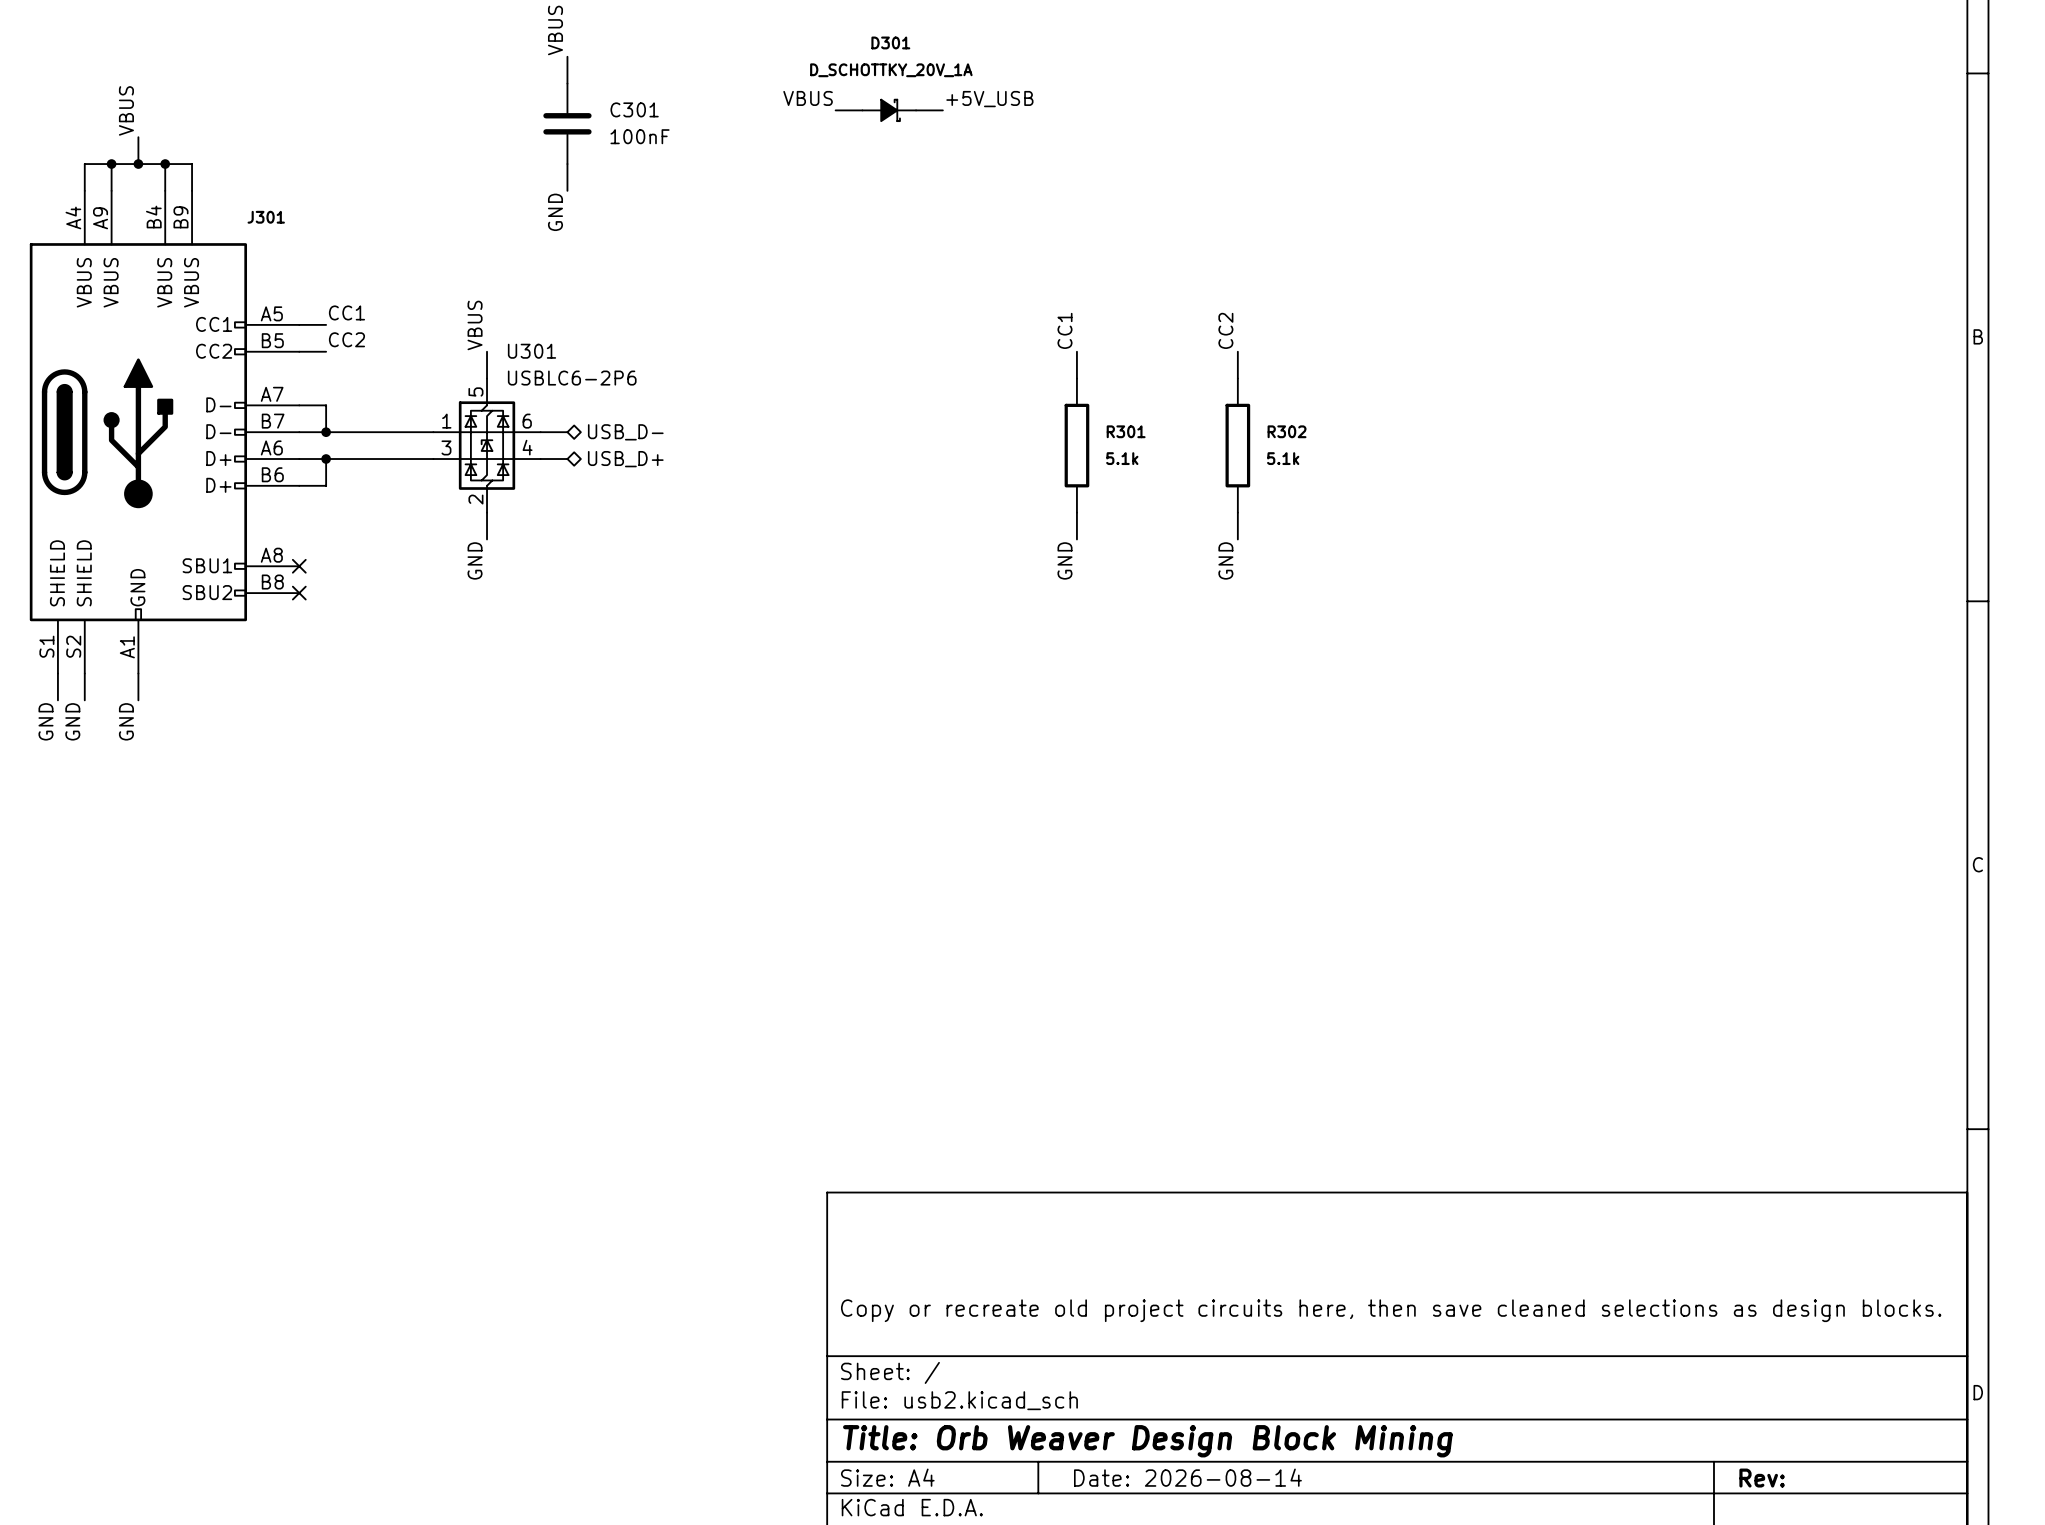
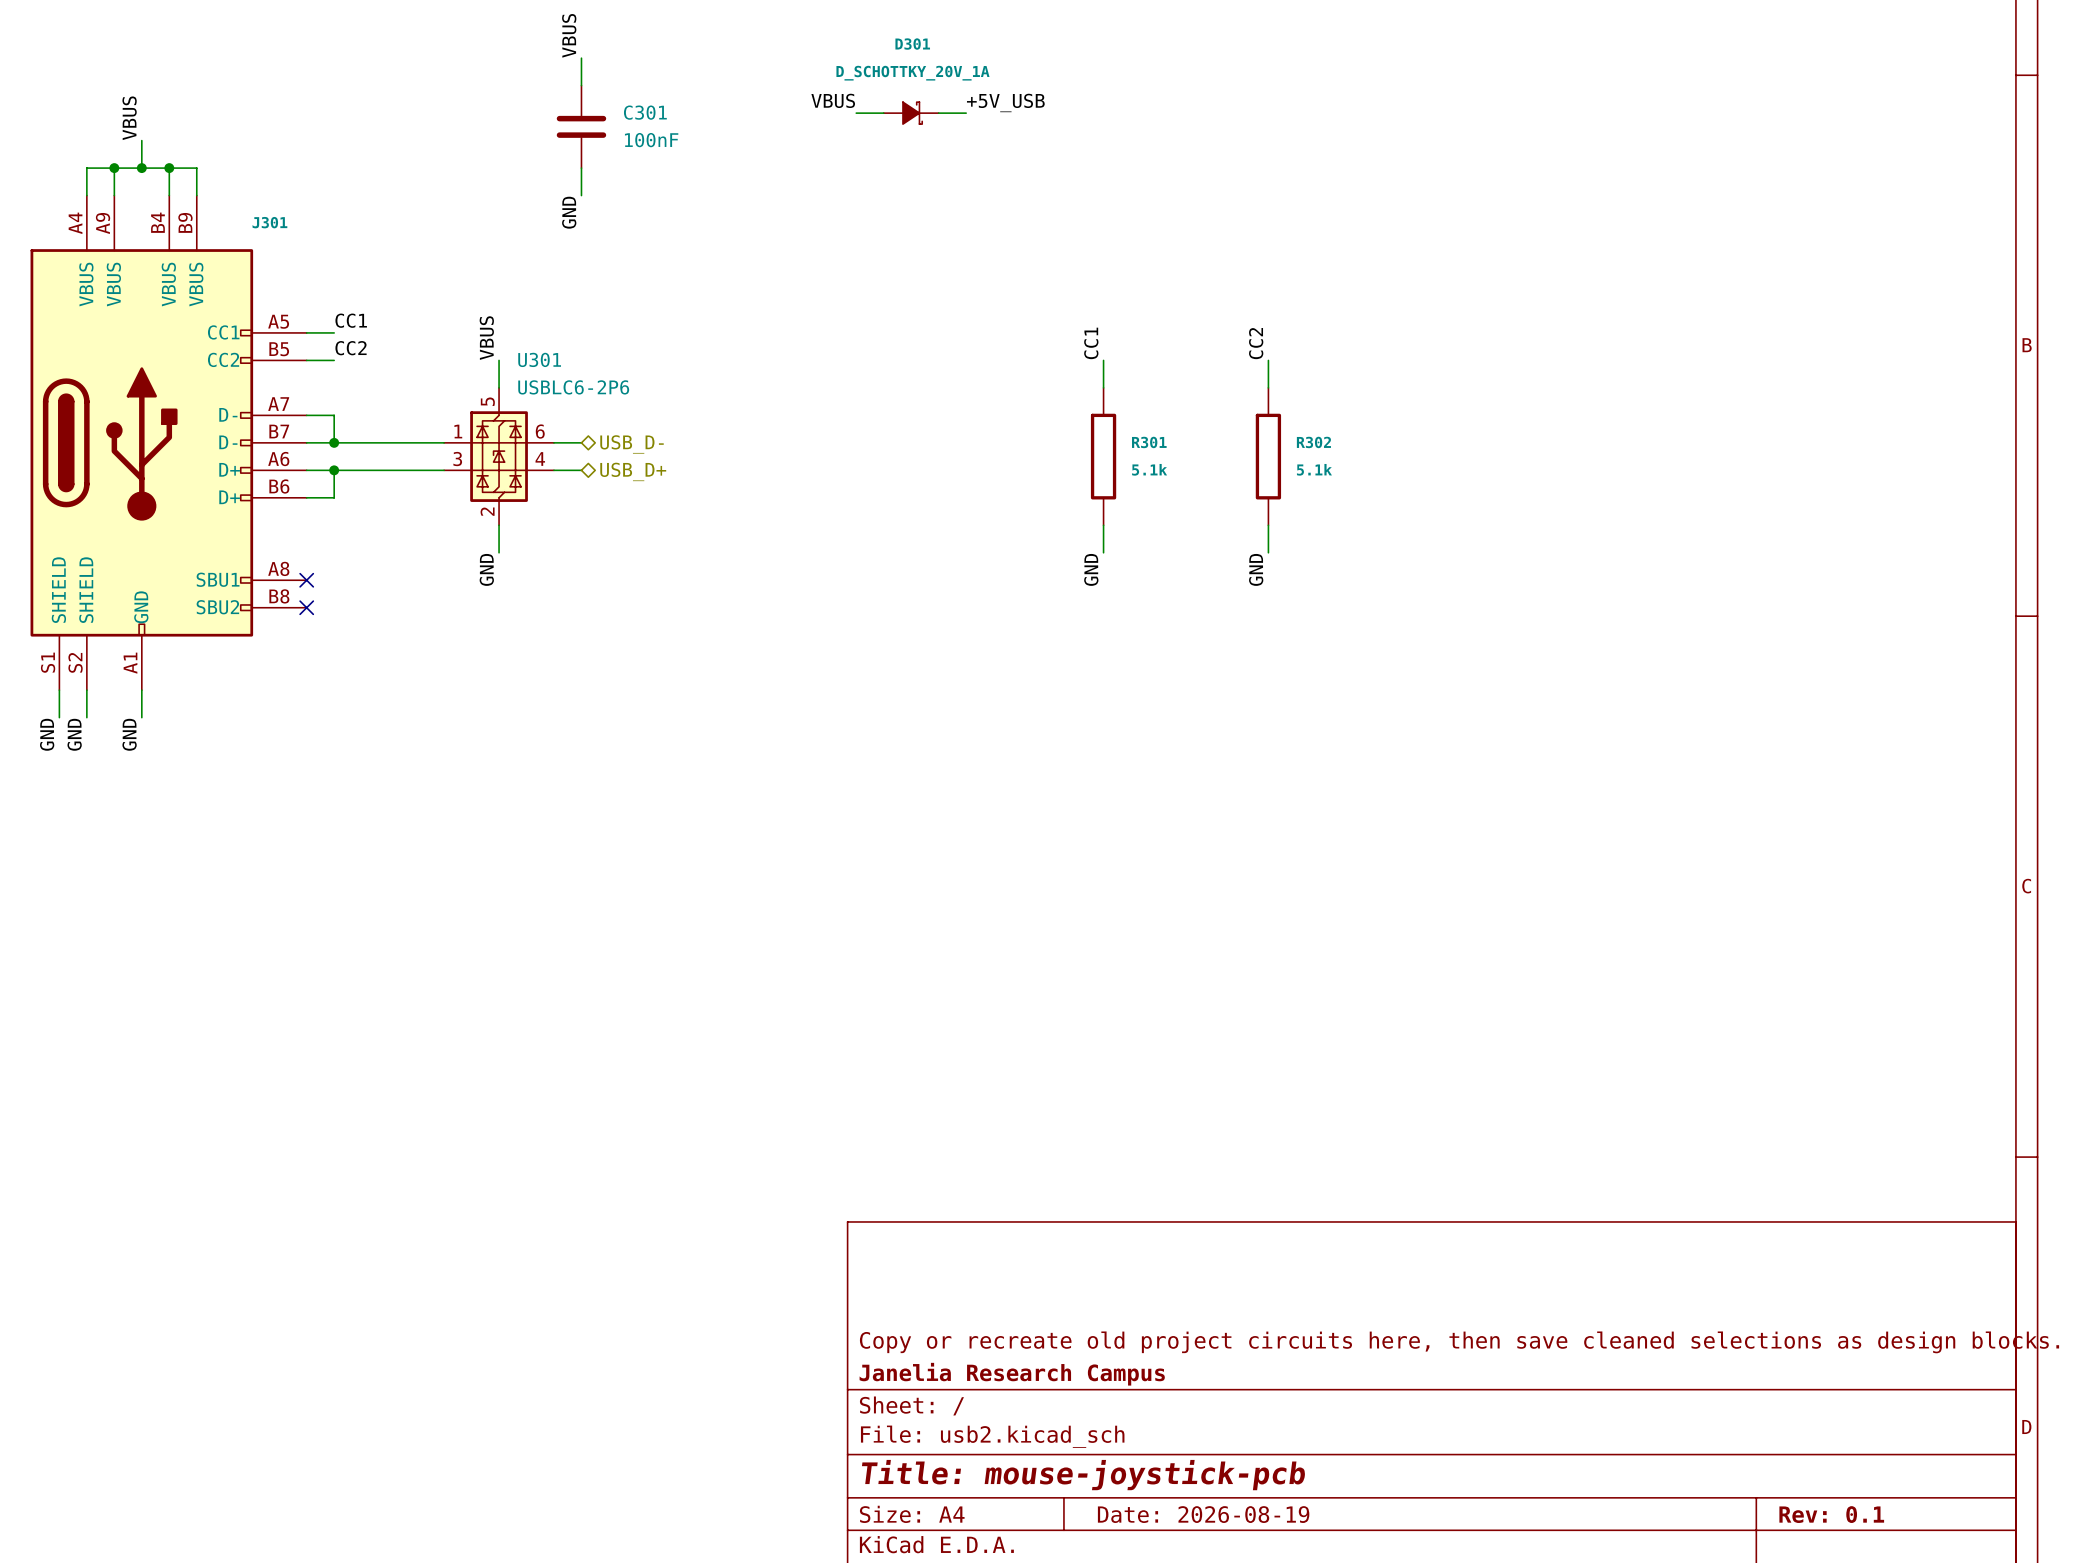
title block: none -> Janelia Research Campus (1012, 1374)
title block: Title: Orb Weaver Design Block Mining (1147, 1441) -> Title: mouse-joystick-pcb (1083, 1475)
title block: Date: 2026-08-14 (1187, 1477) -> Date: 2026-08-19 (1203, 1514)
title block: Rev: (1762, 1478) -> Rev: 0.1 (1831, 1514)

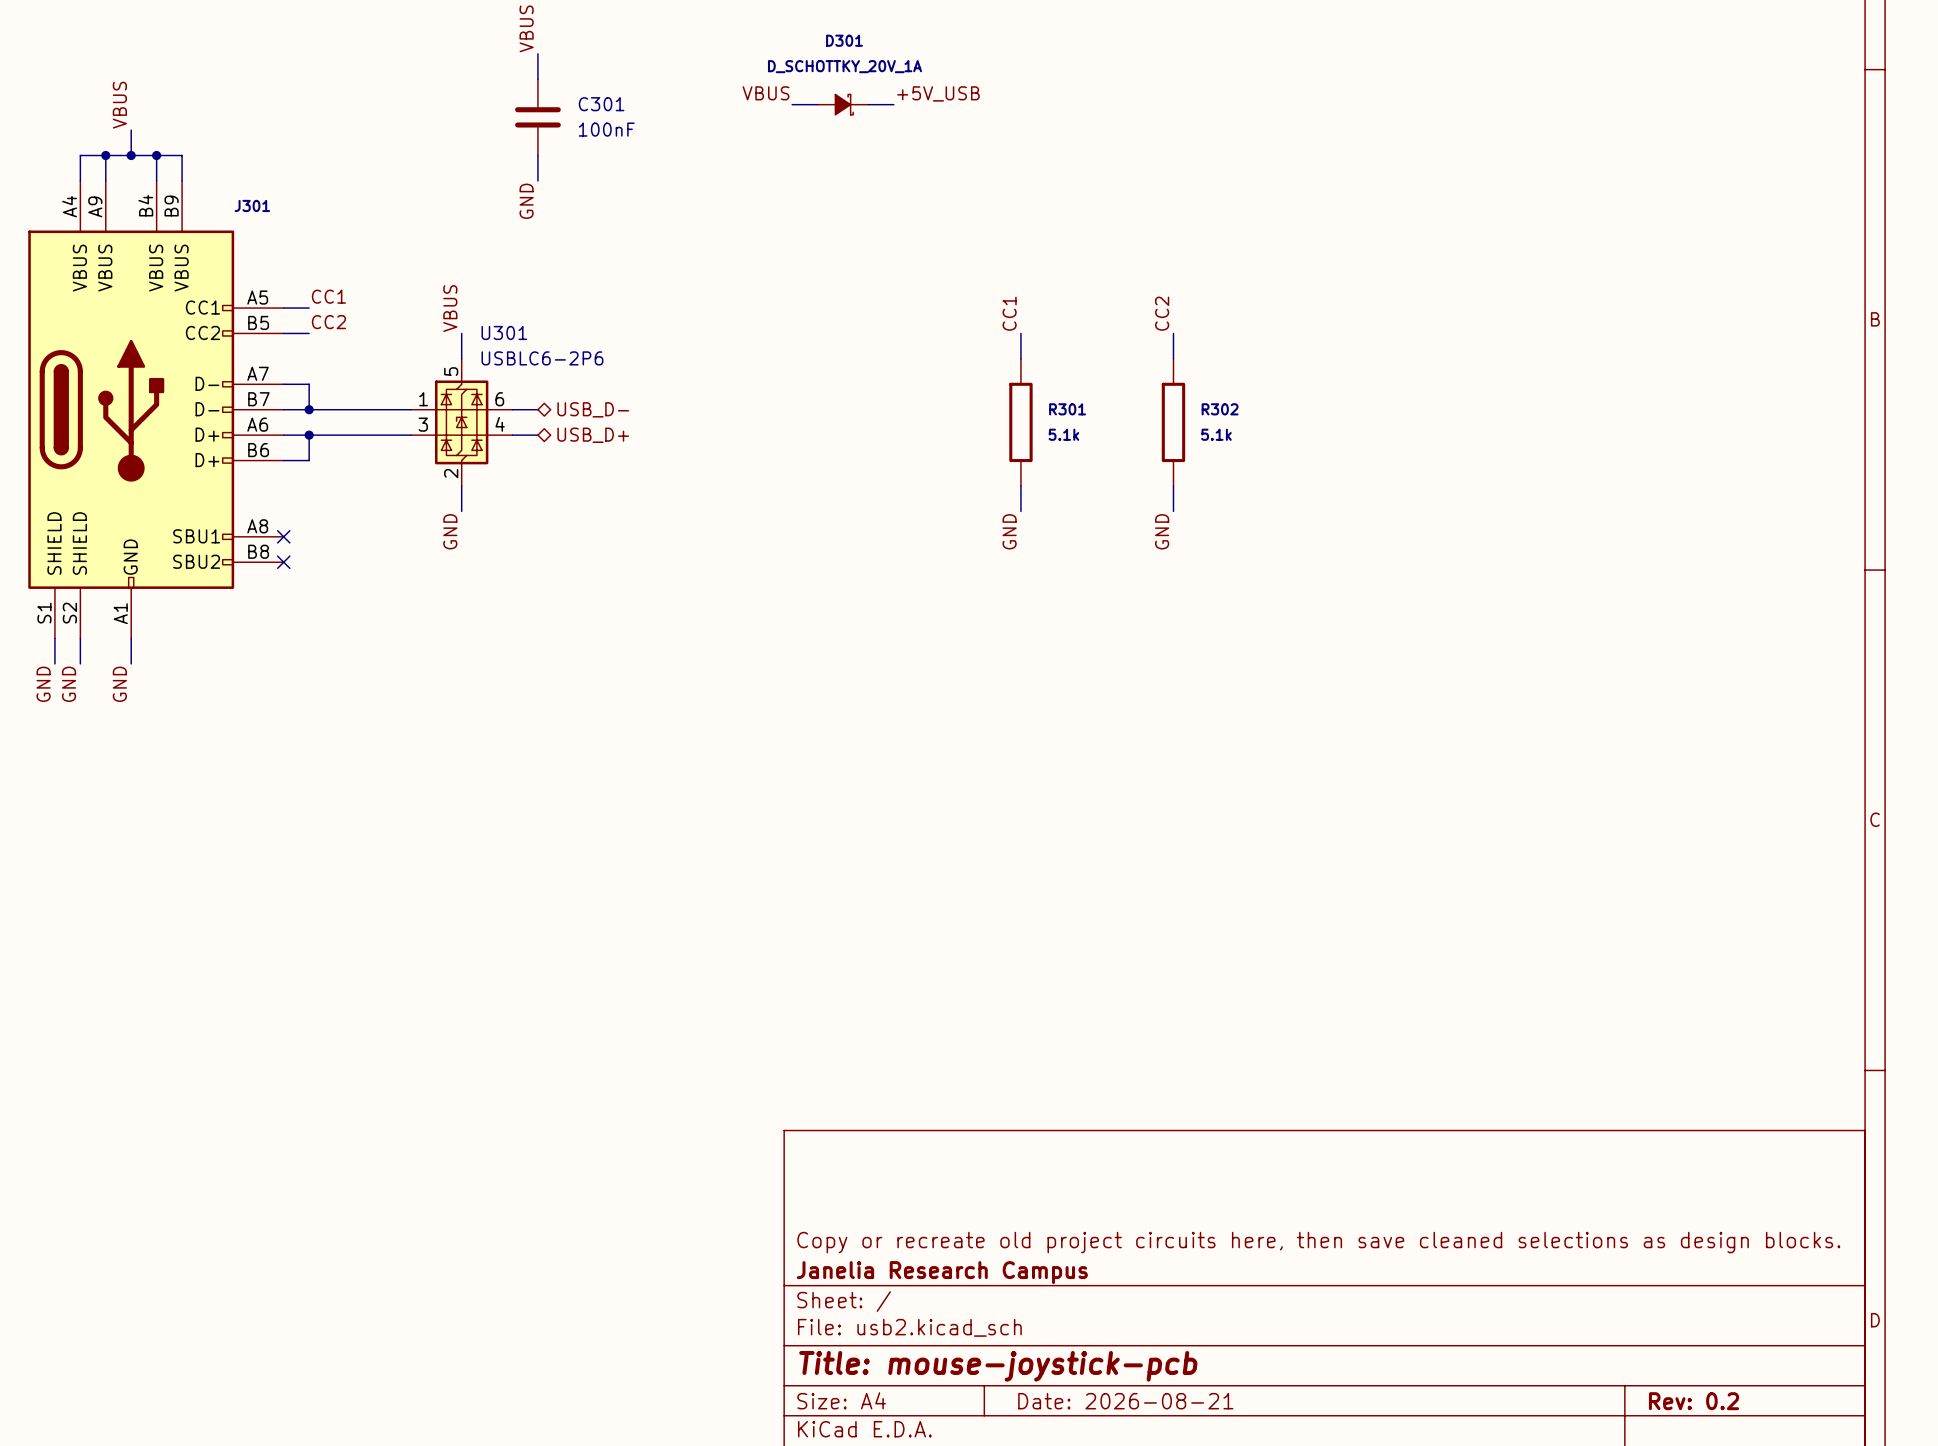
title block: Date: 2026-08-19 (1203, 1514) -> Date: 2026-08-21 (1125, 1401)
title block: Rev: 0.1 (1831, 1514) -> Rev: 0.2 (1694, 1401)

